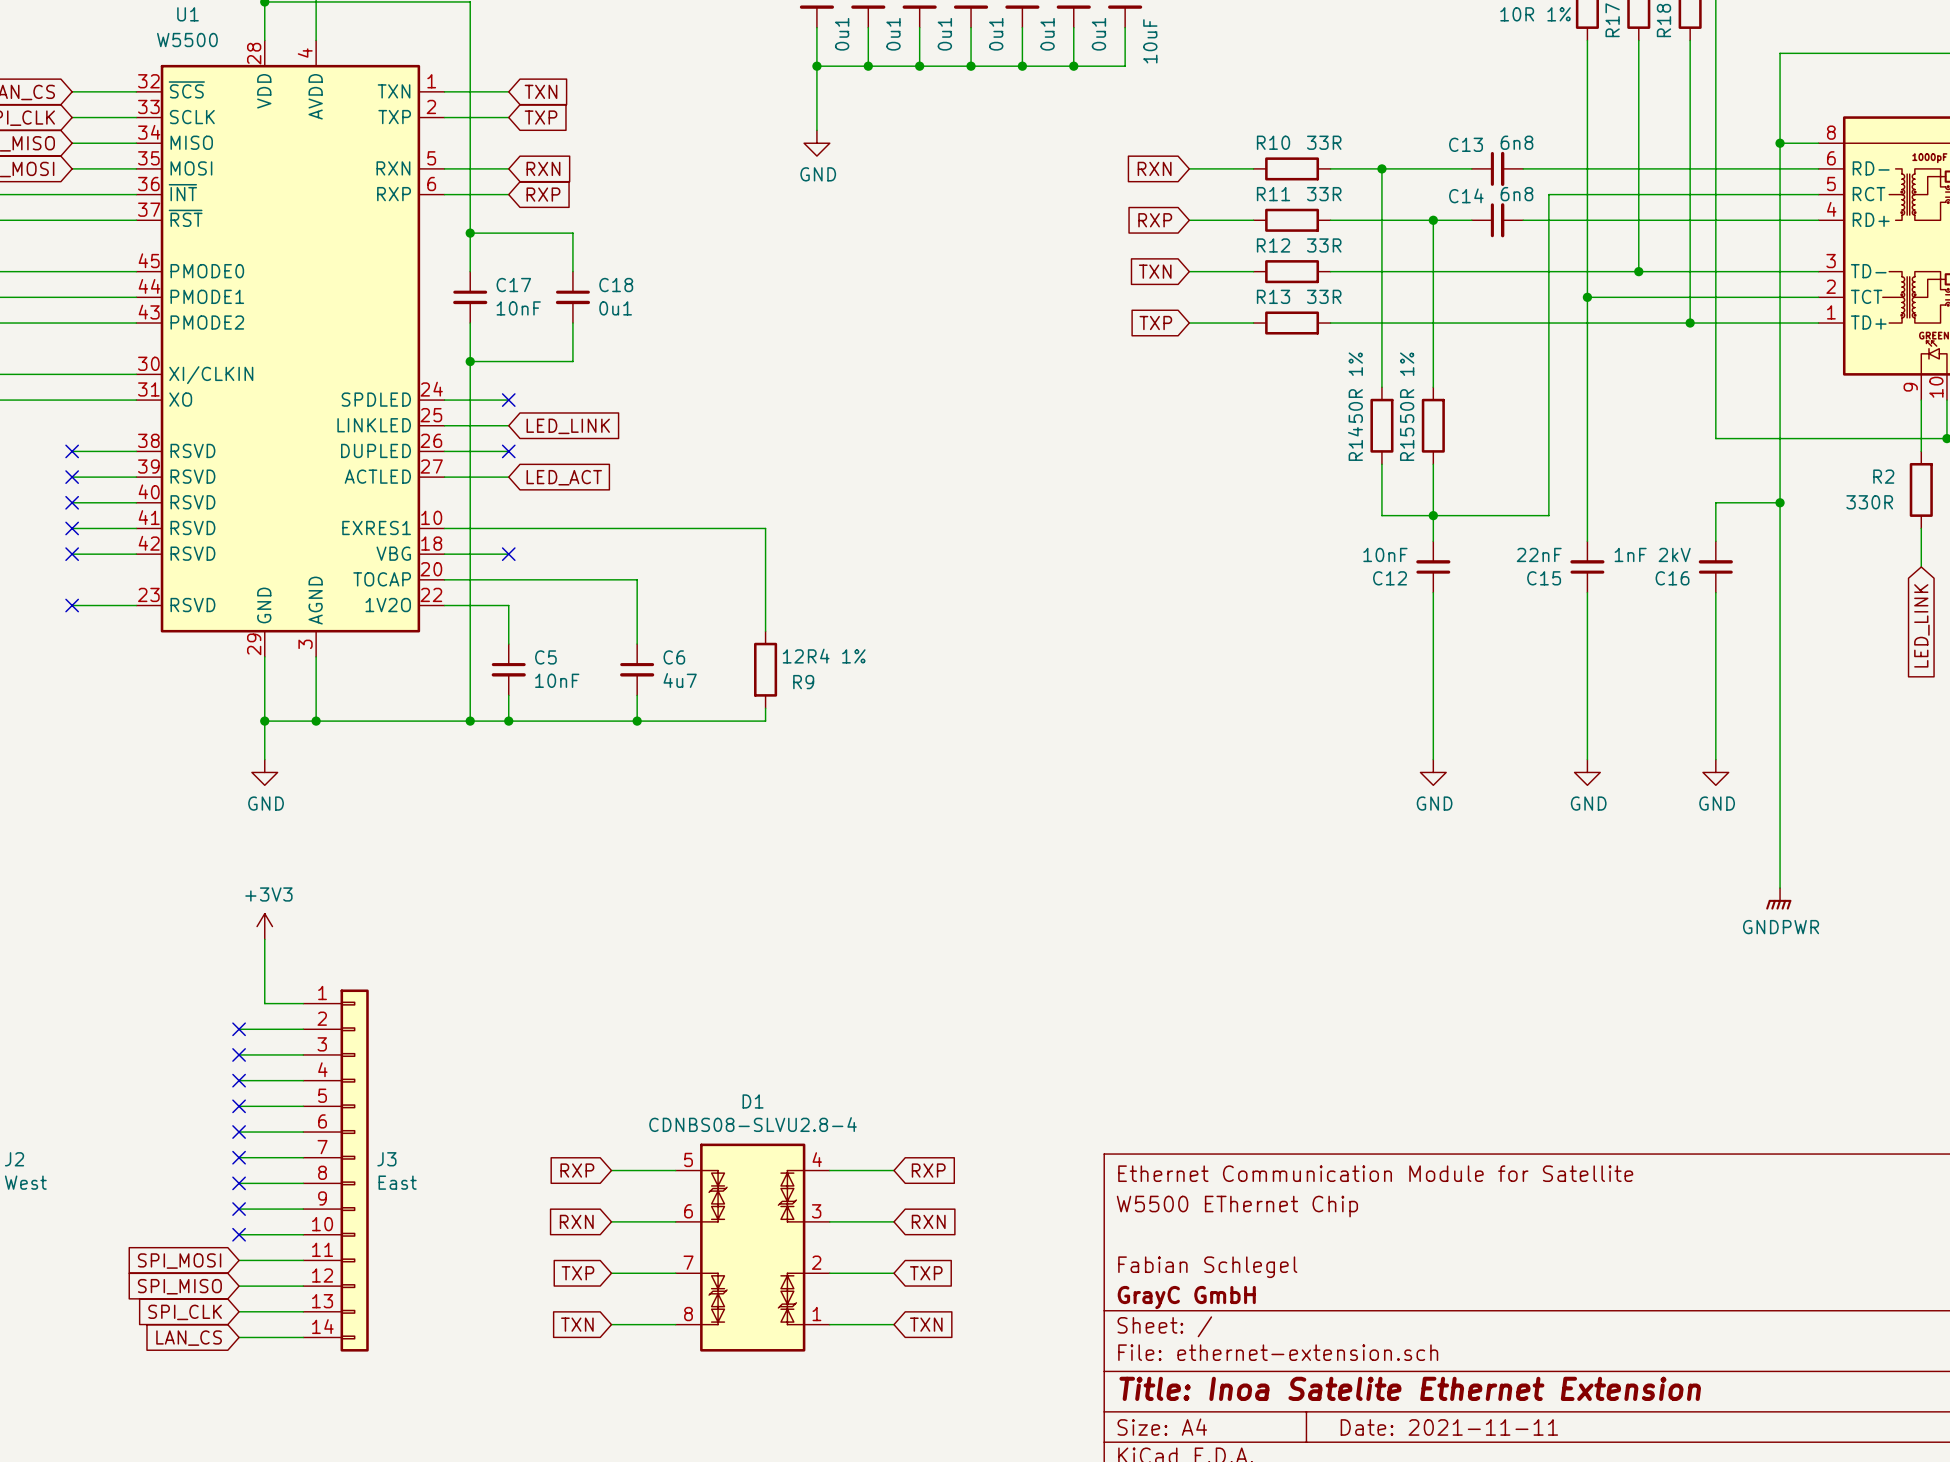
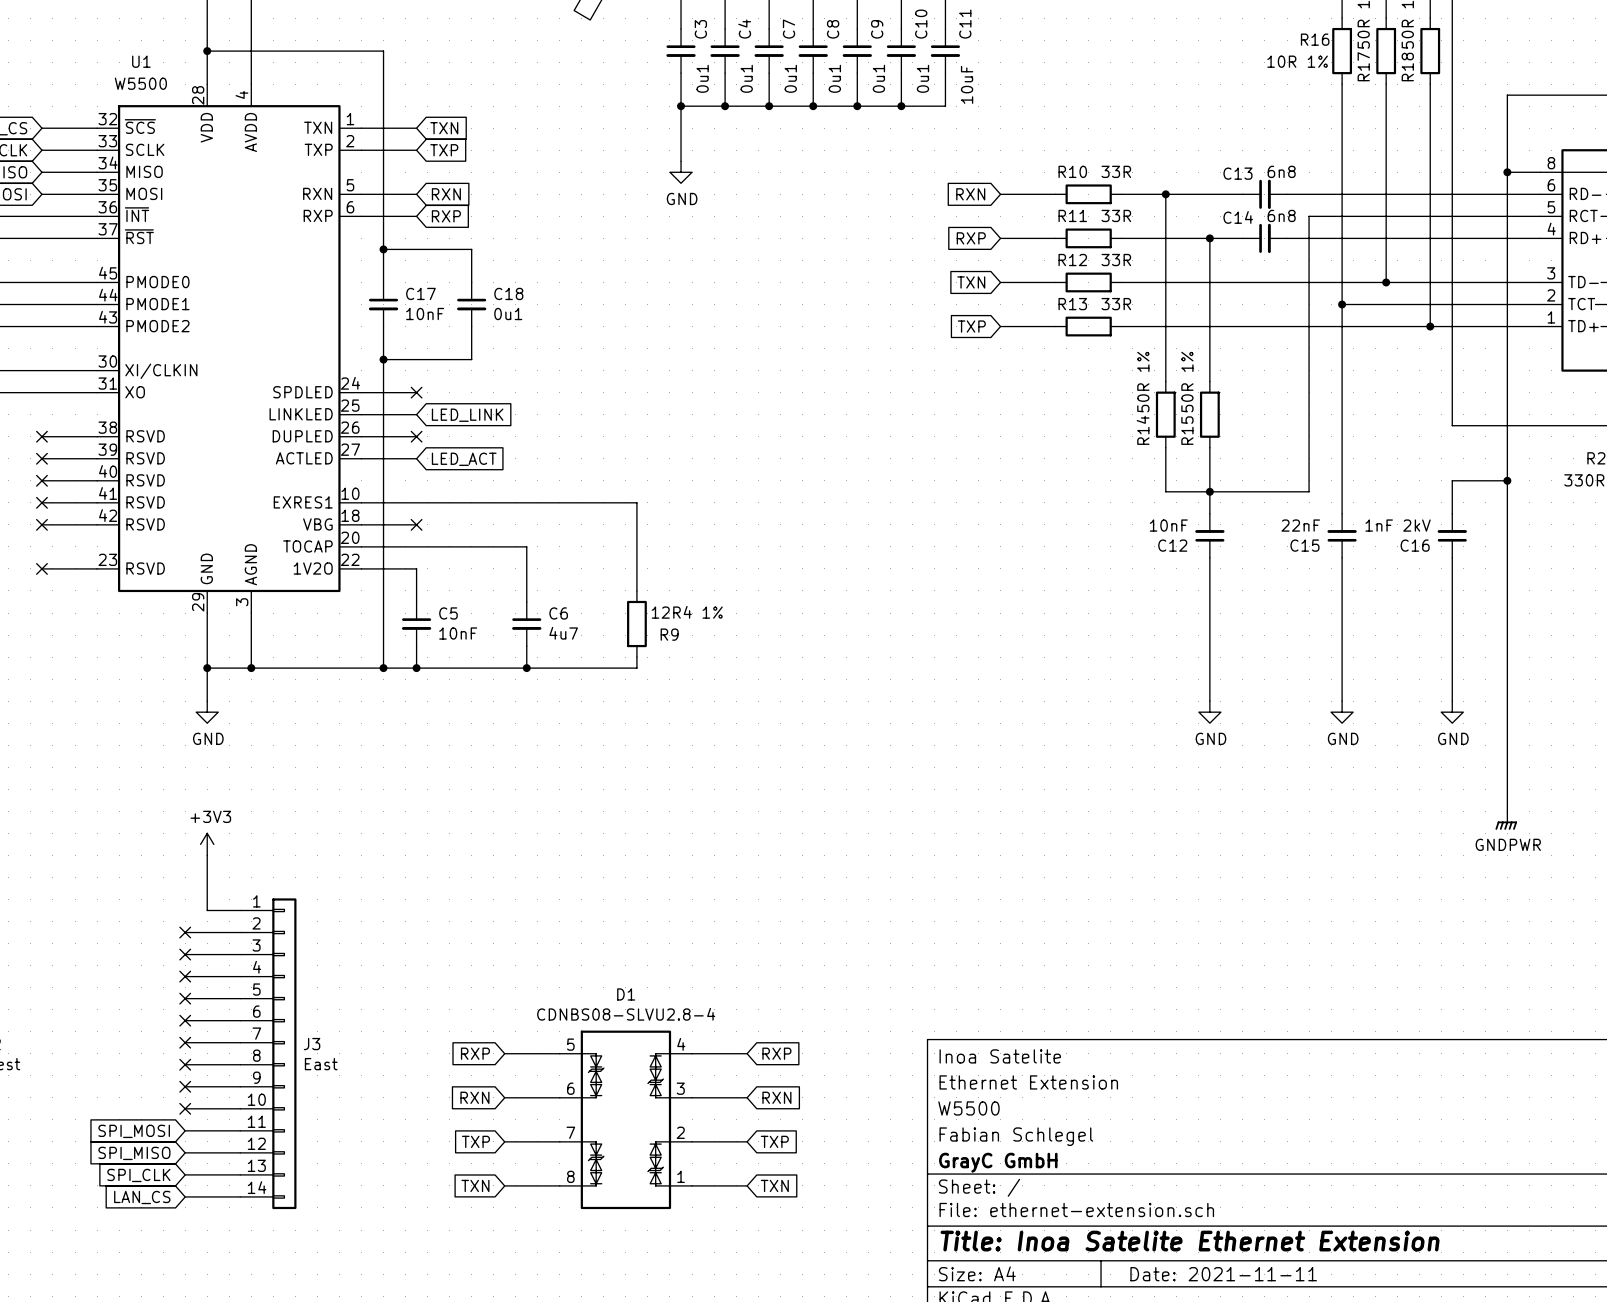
title block: Ethernet Communication Module for Satellite (1375, 1173) -> Inoa Satelite (1000, 1056)
title block: W5500 EThernet Chip (1237, 1206) -> Ethernet Extension (1028, 1082)
title block: none -> W5500 (968, 1108)

